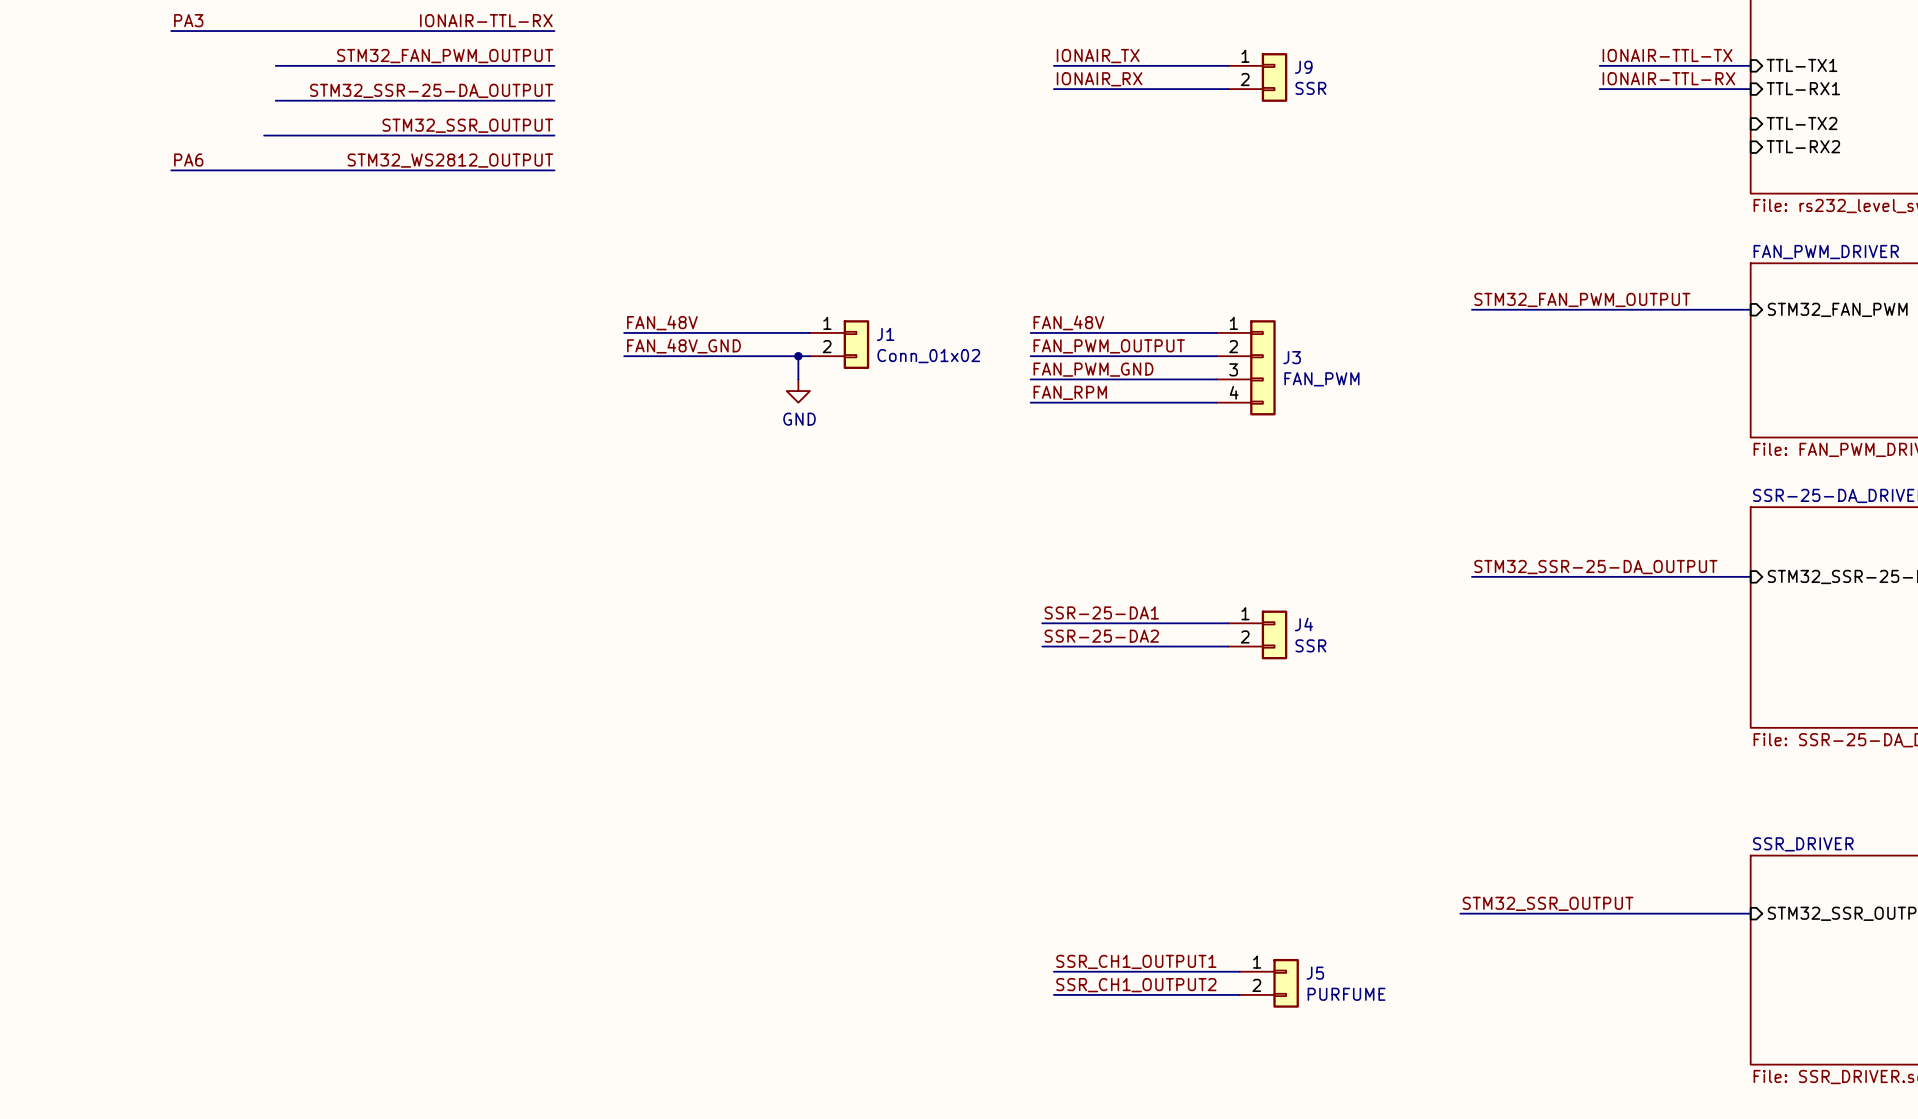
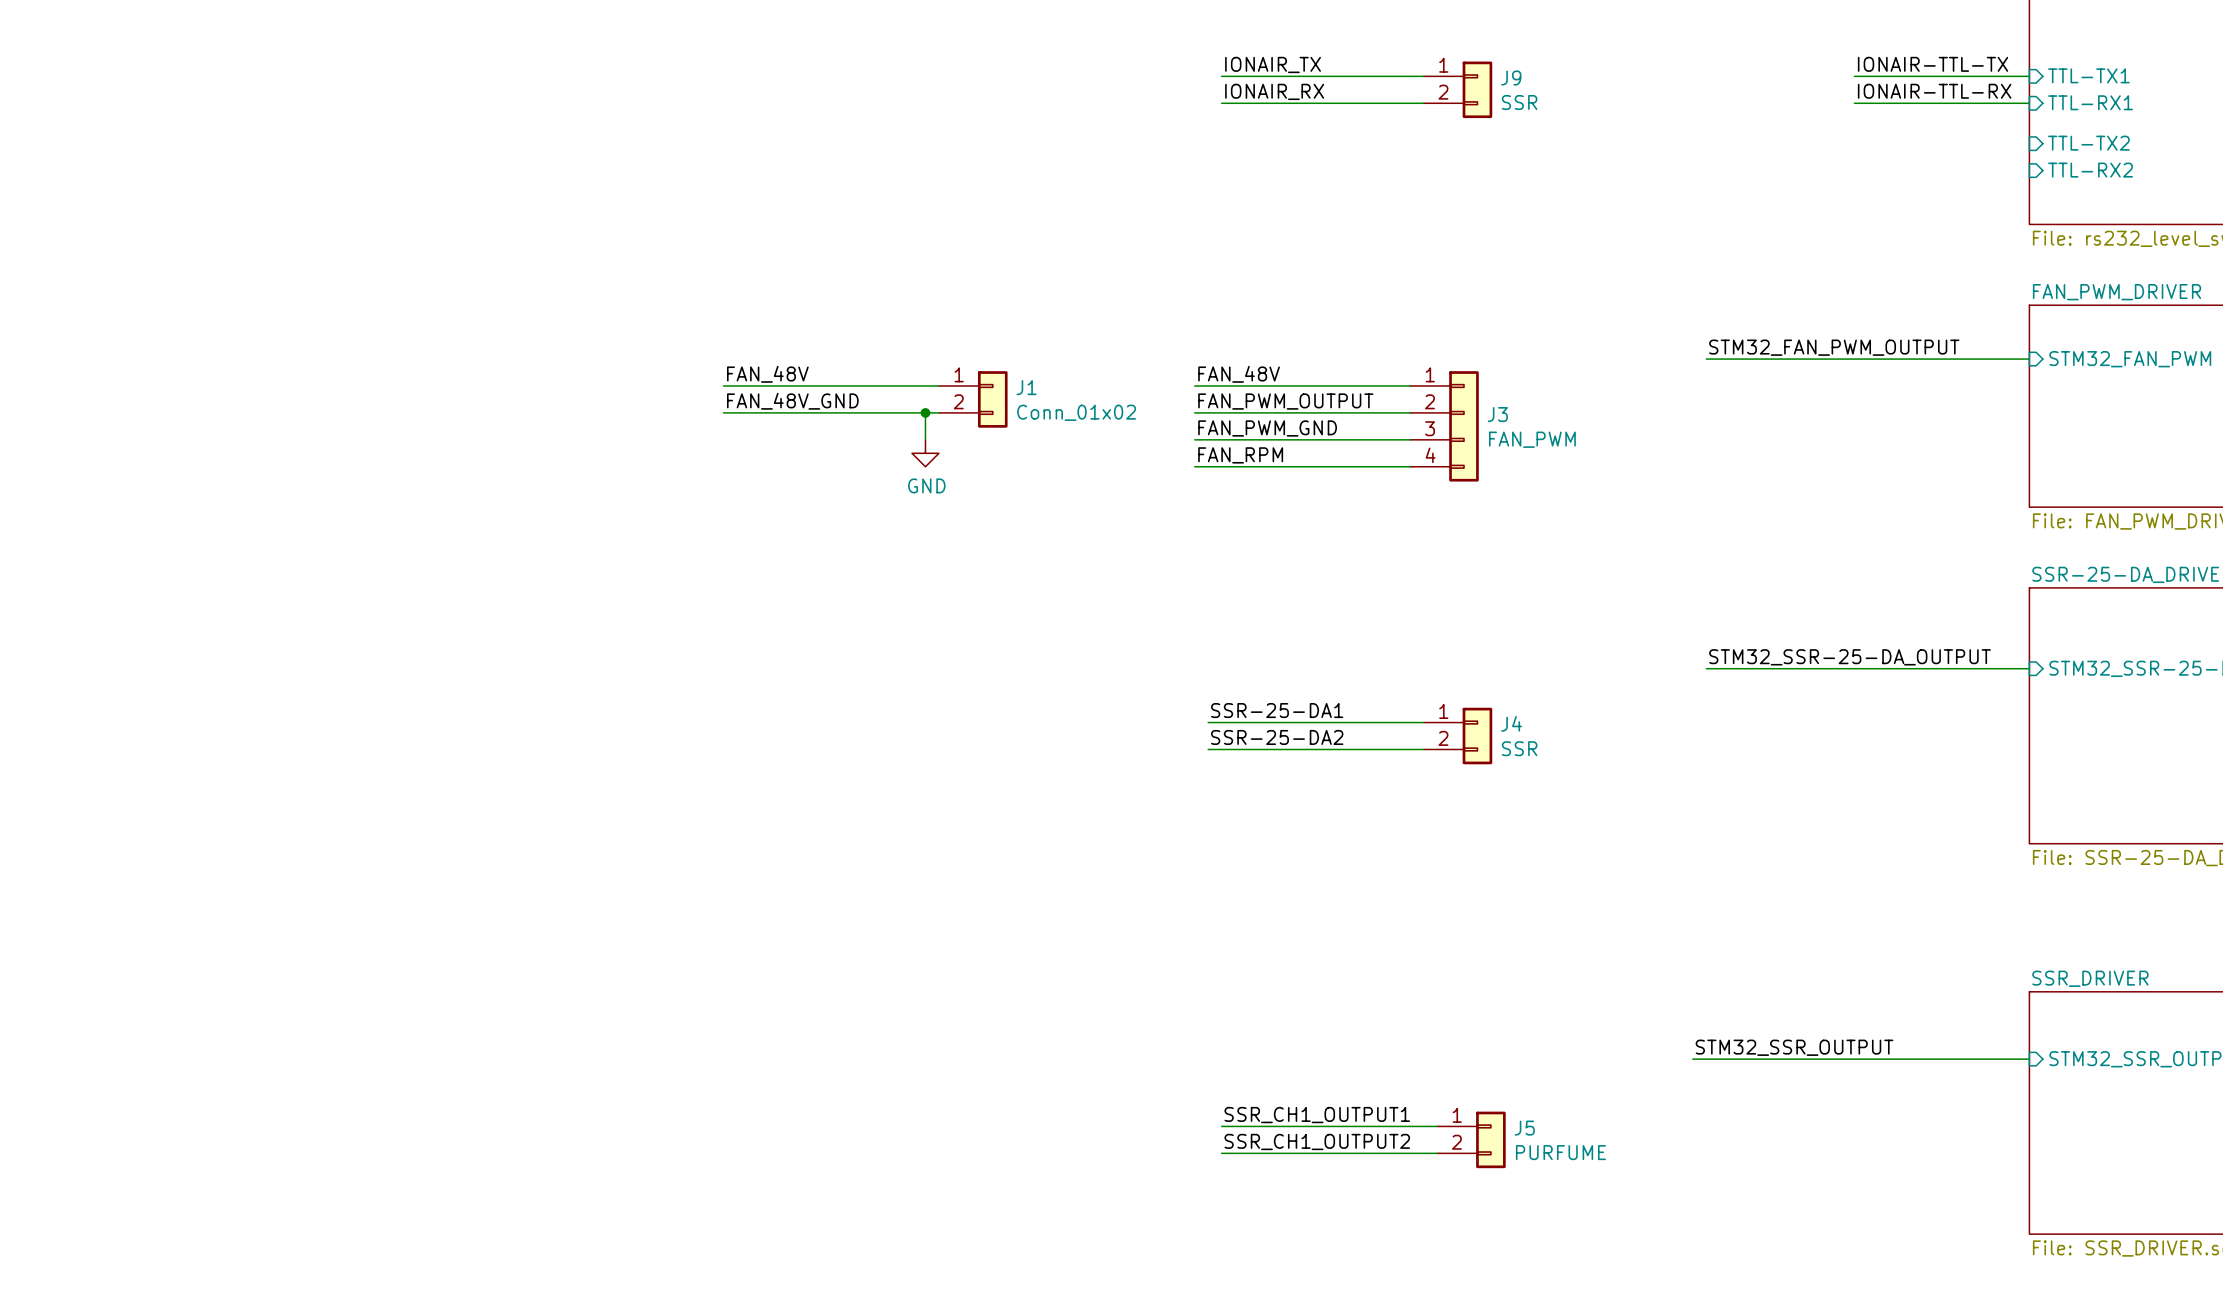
label: PA3 (188, 20) -> none
label: IONAIR-TTL-RX (486, 20) -> none
wire: (171, 31) (554, 31) -> none
label: STM32_FAN_PWM_OUTPUT (445, 56) -> none
wire: (275, 65) (554, 65) -> none
label: STM32_SSR-25-DA_OUTPUT (431, 90) -> none
wire: (275, 100) (554, 100) -> none
label: STM32_SSR_OUTPUT (467, 125) -> none
wire: (264, 135) (554, 135) -> none
label: PA6 (188, 160) -> none
label: STM32_WS2812_OUTPUT (450, 160) -> none
wire: (171, 170) (554, 170) -> none

